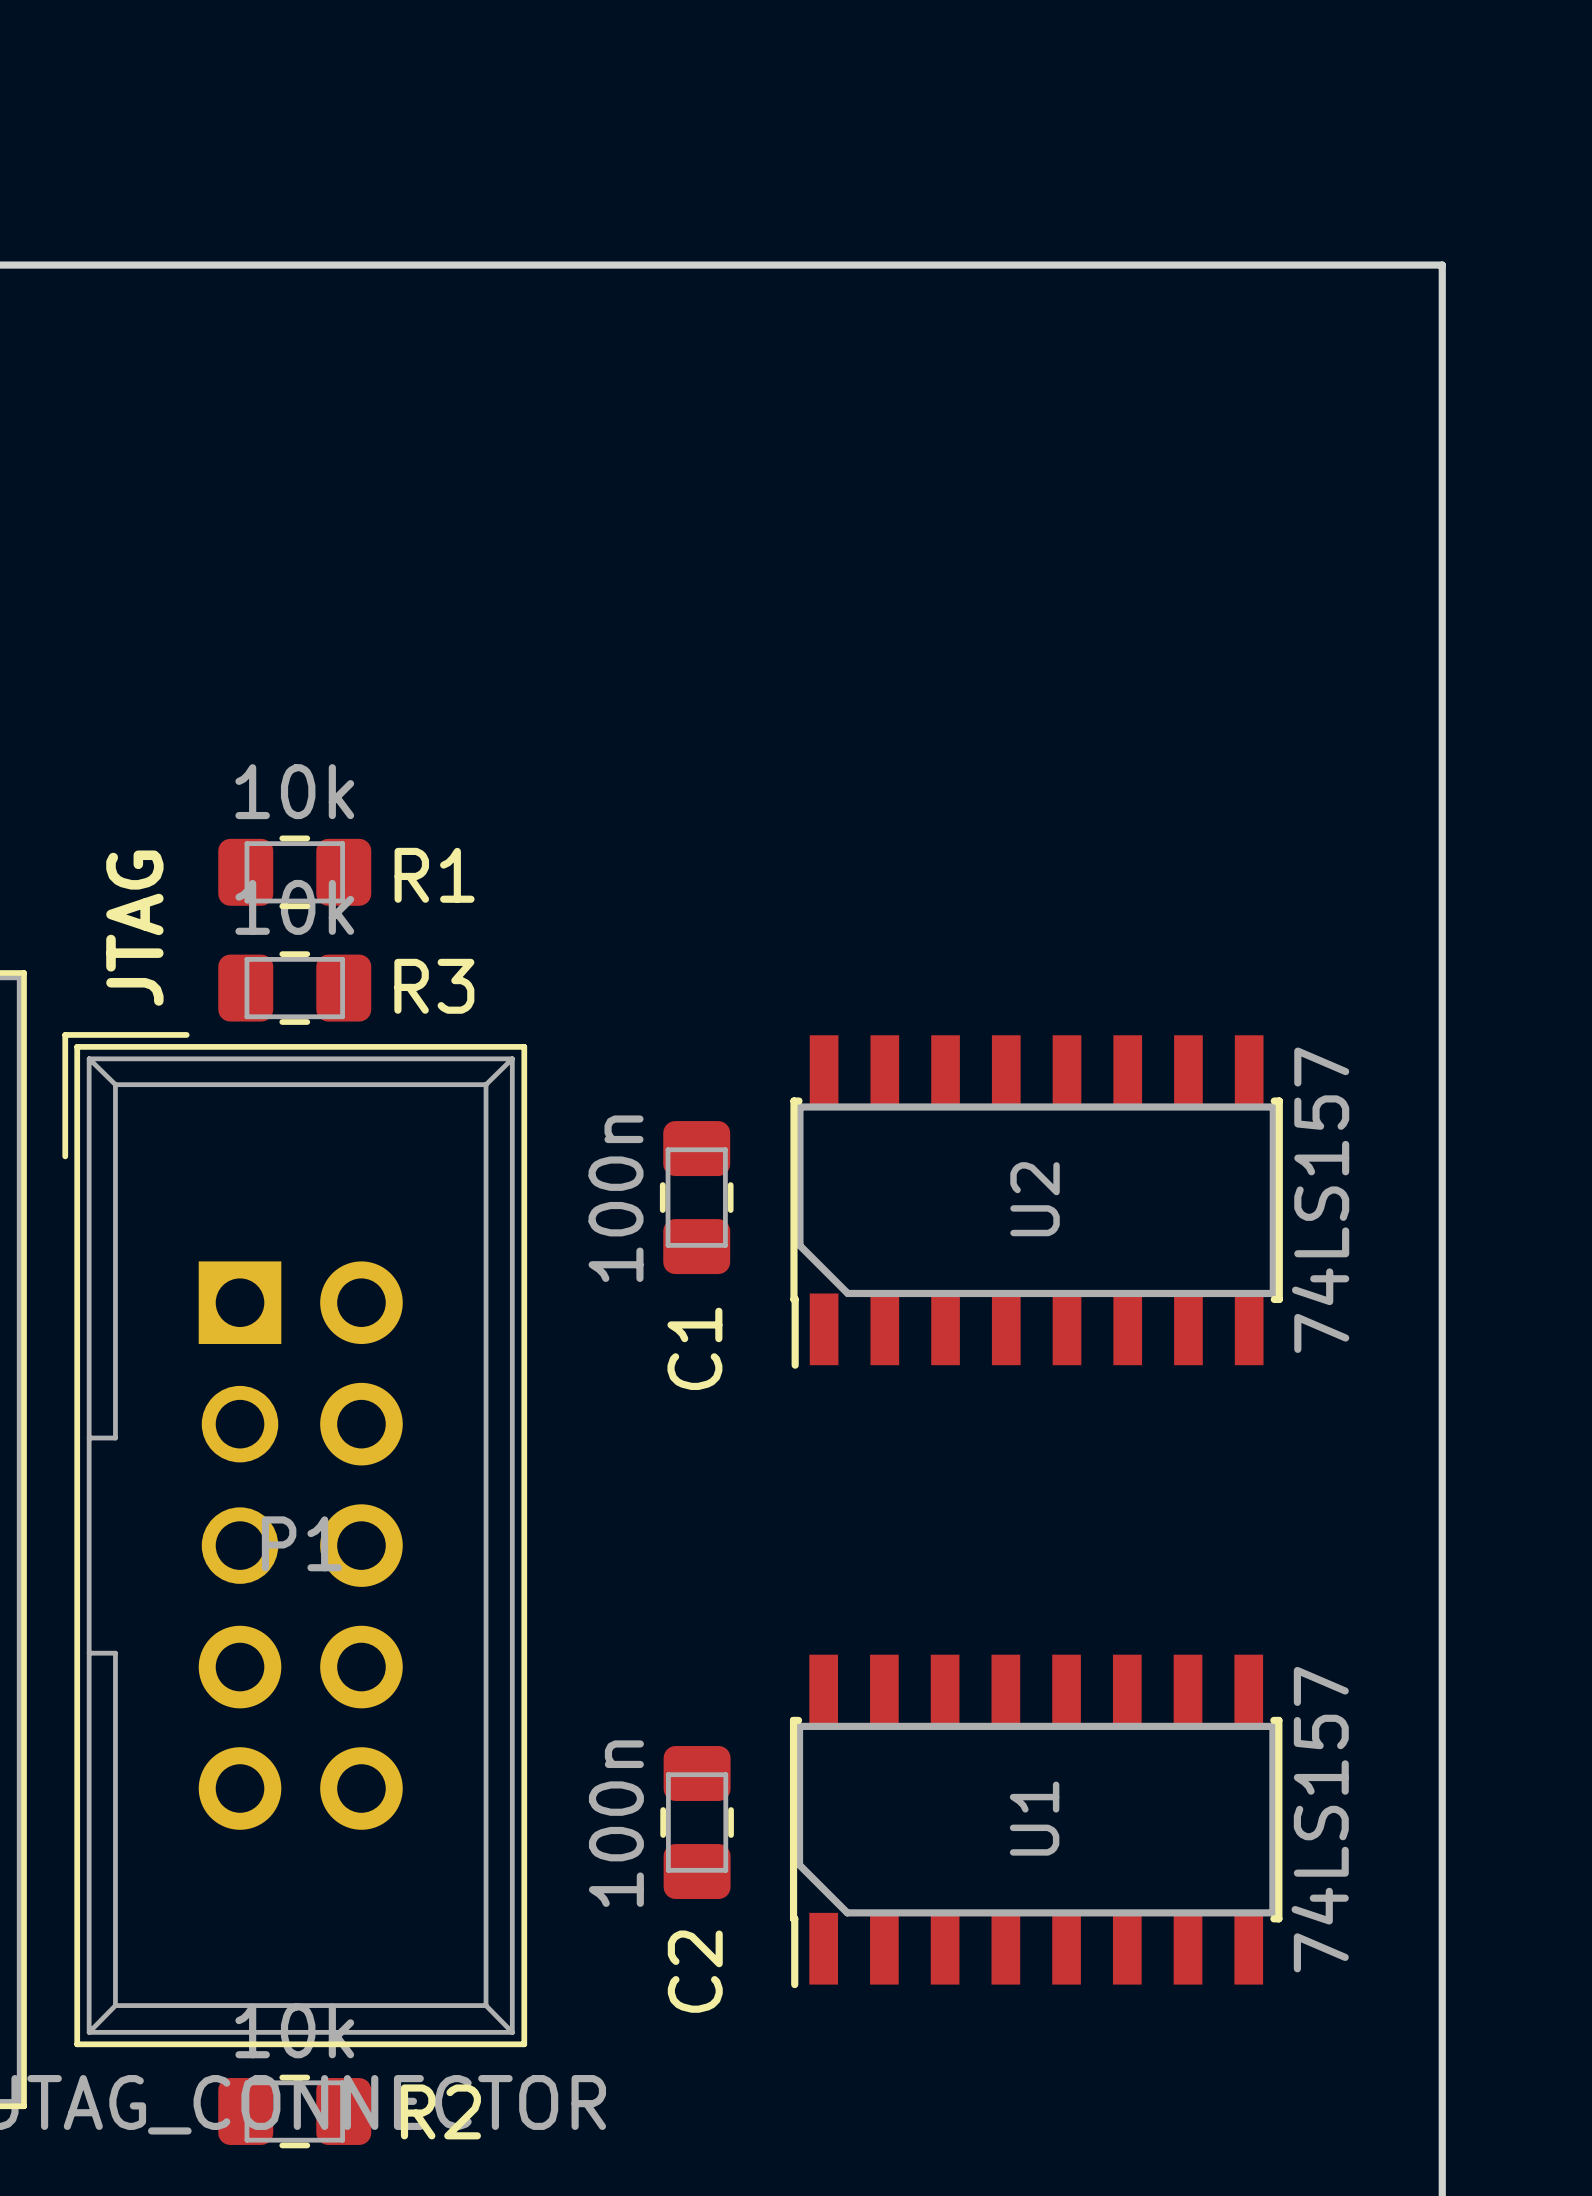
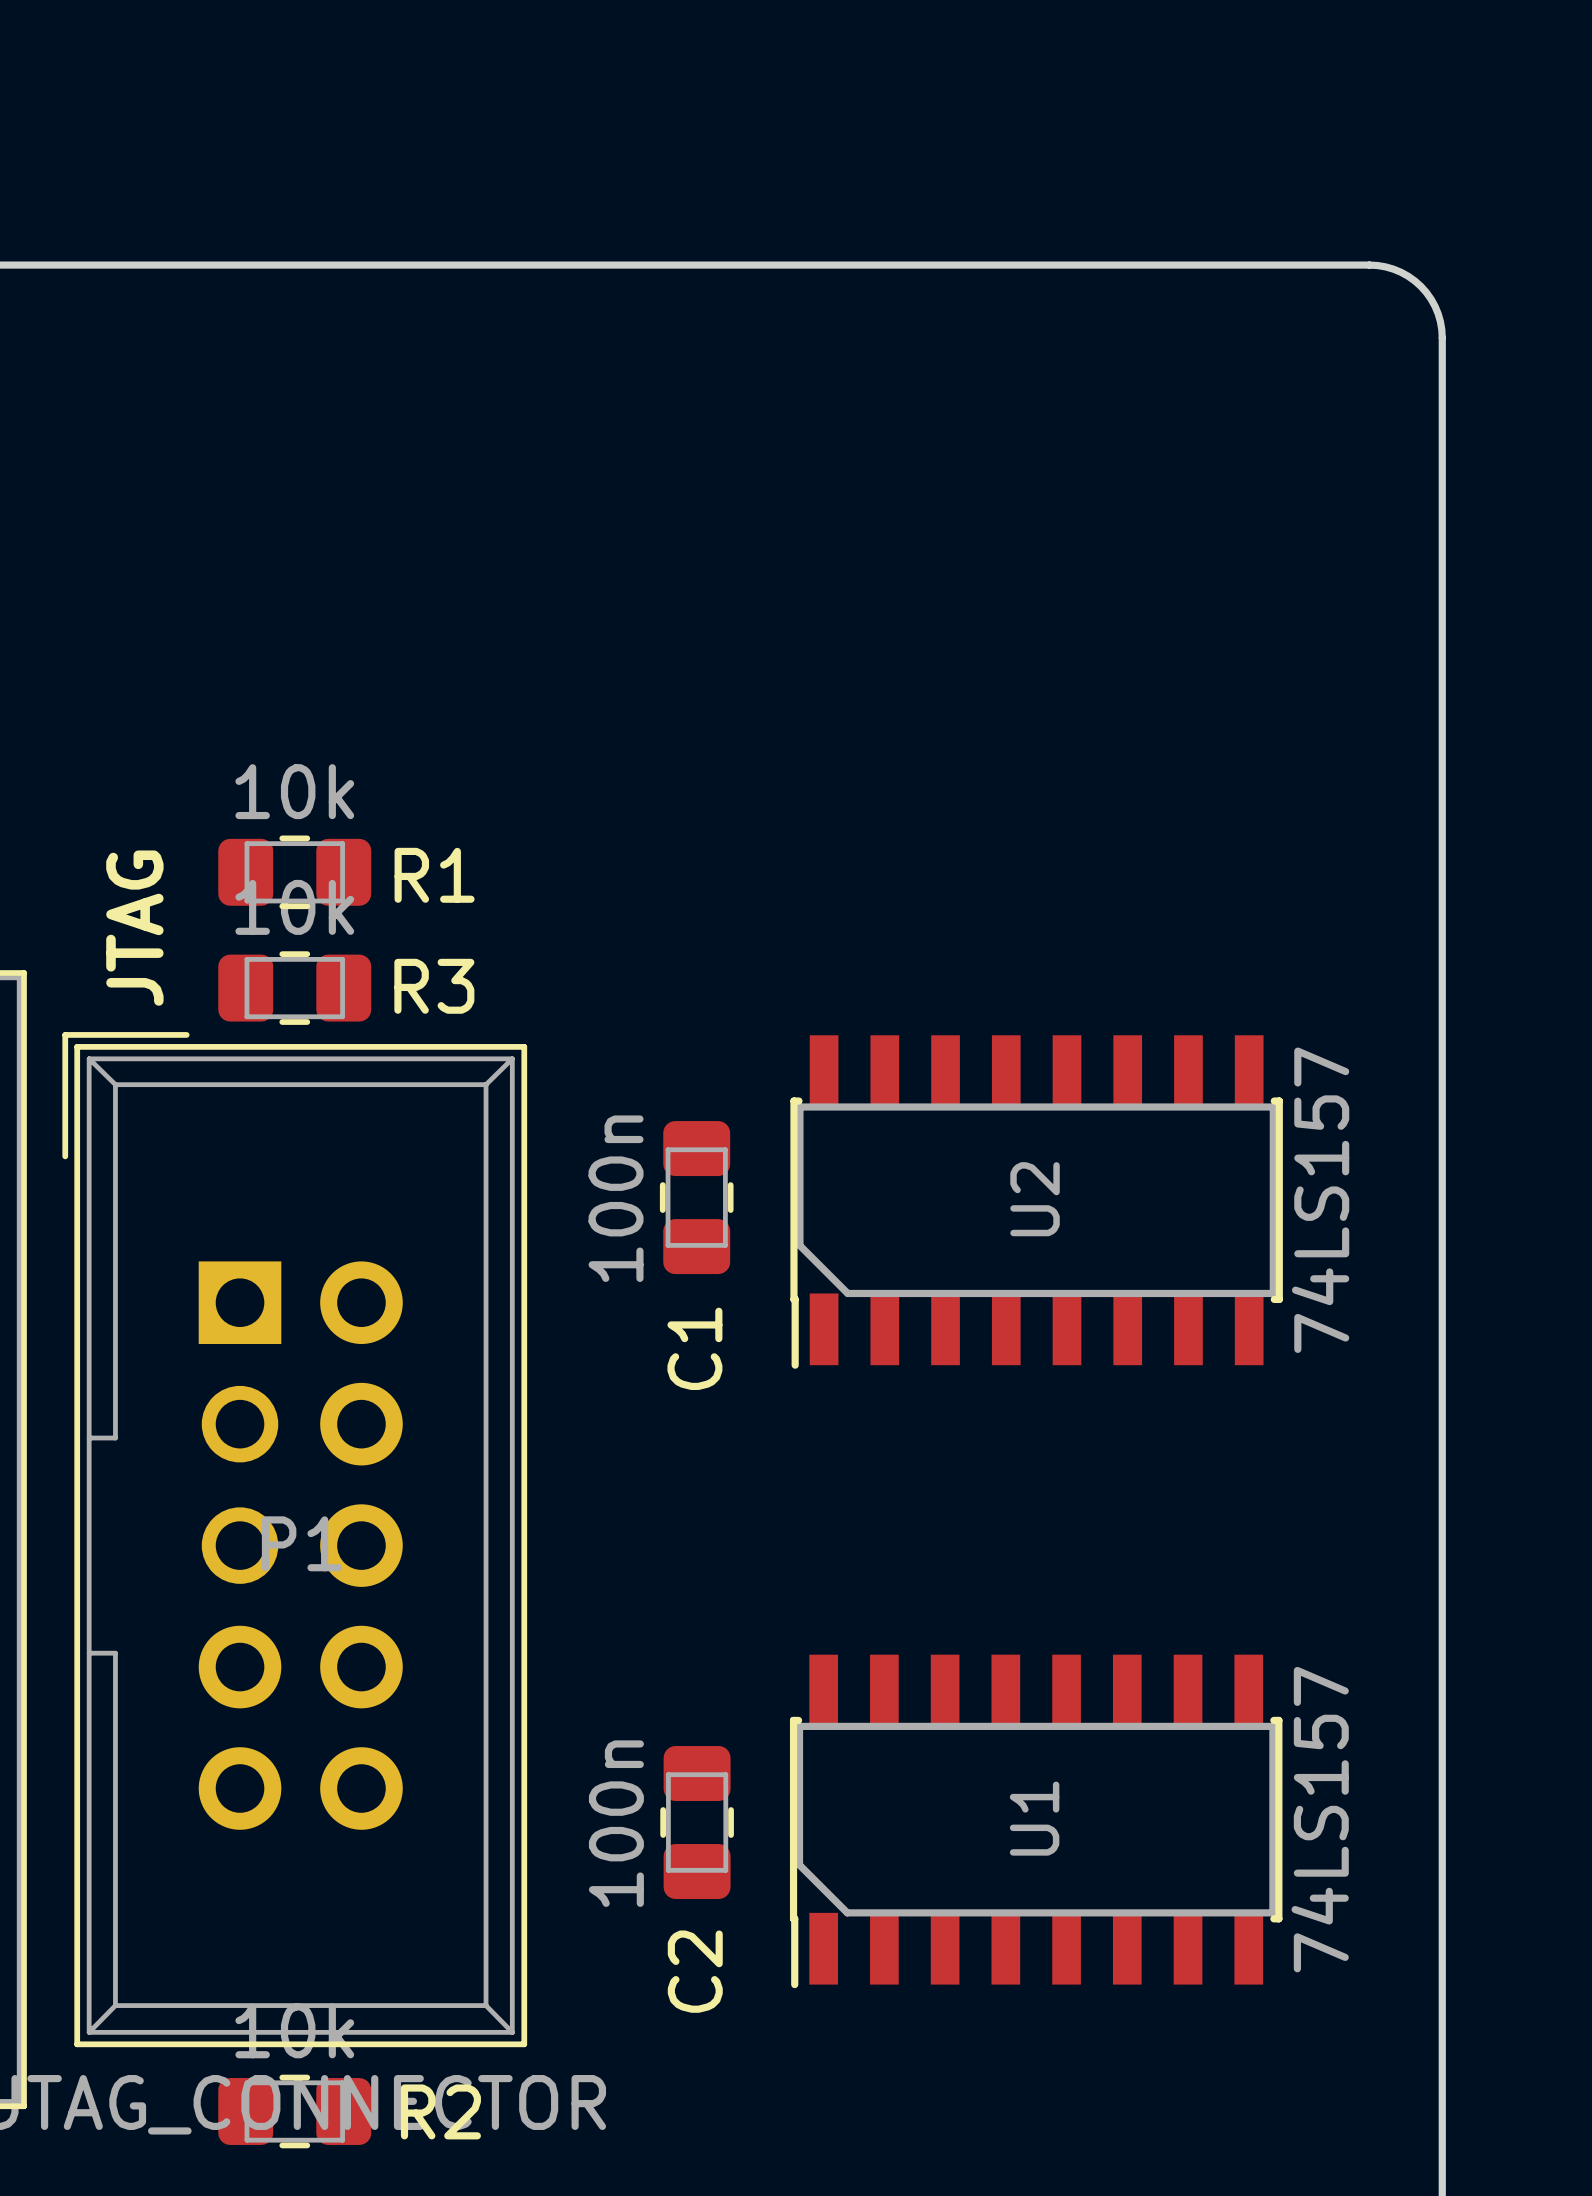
board edge: (1369, 265) (1442, 265) (1442, 337) -> (1369, 265) (1385, 266) (1401, 272) (1420, 286) (1431, 299) (1438, 313) (1442, 337)

